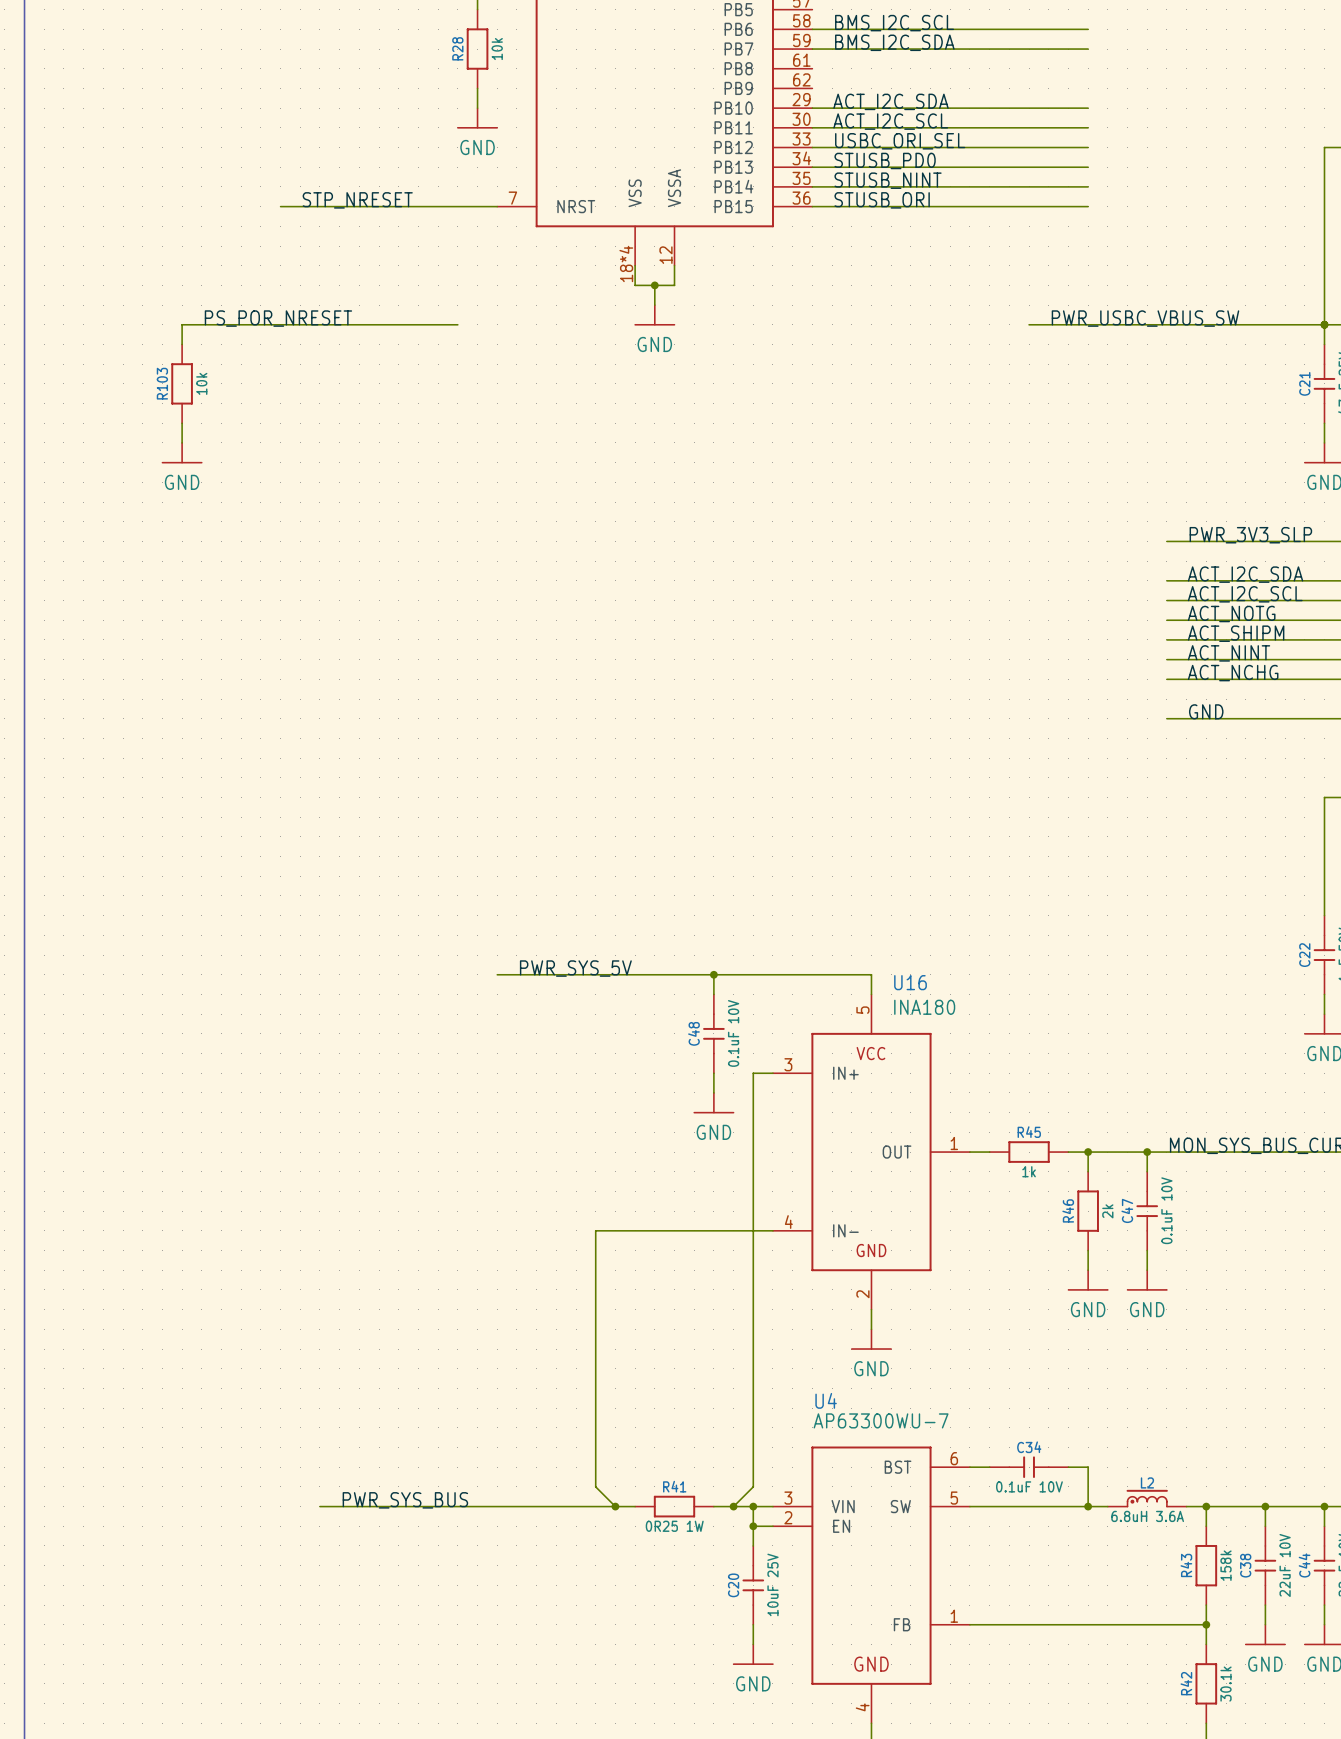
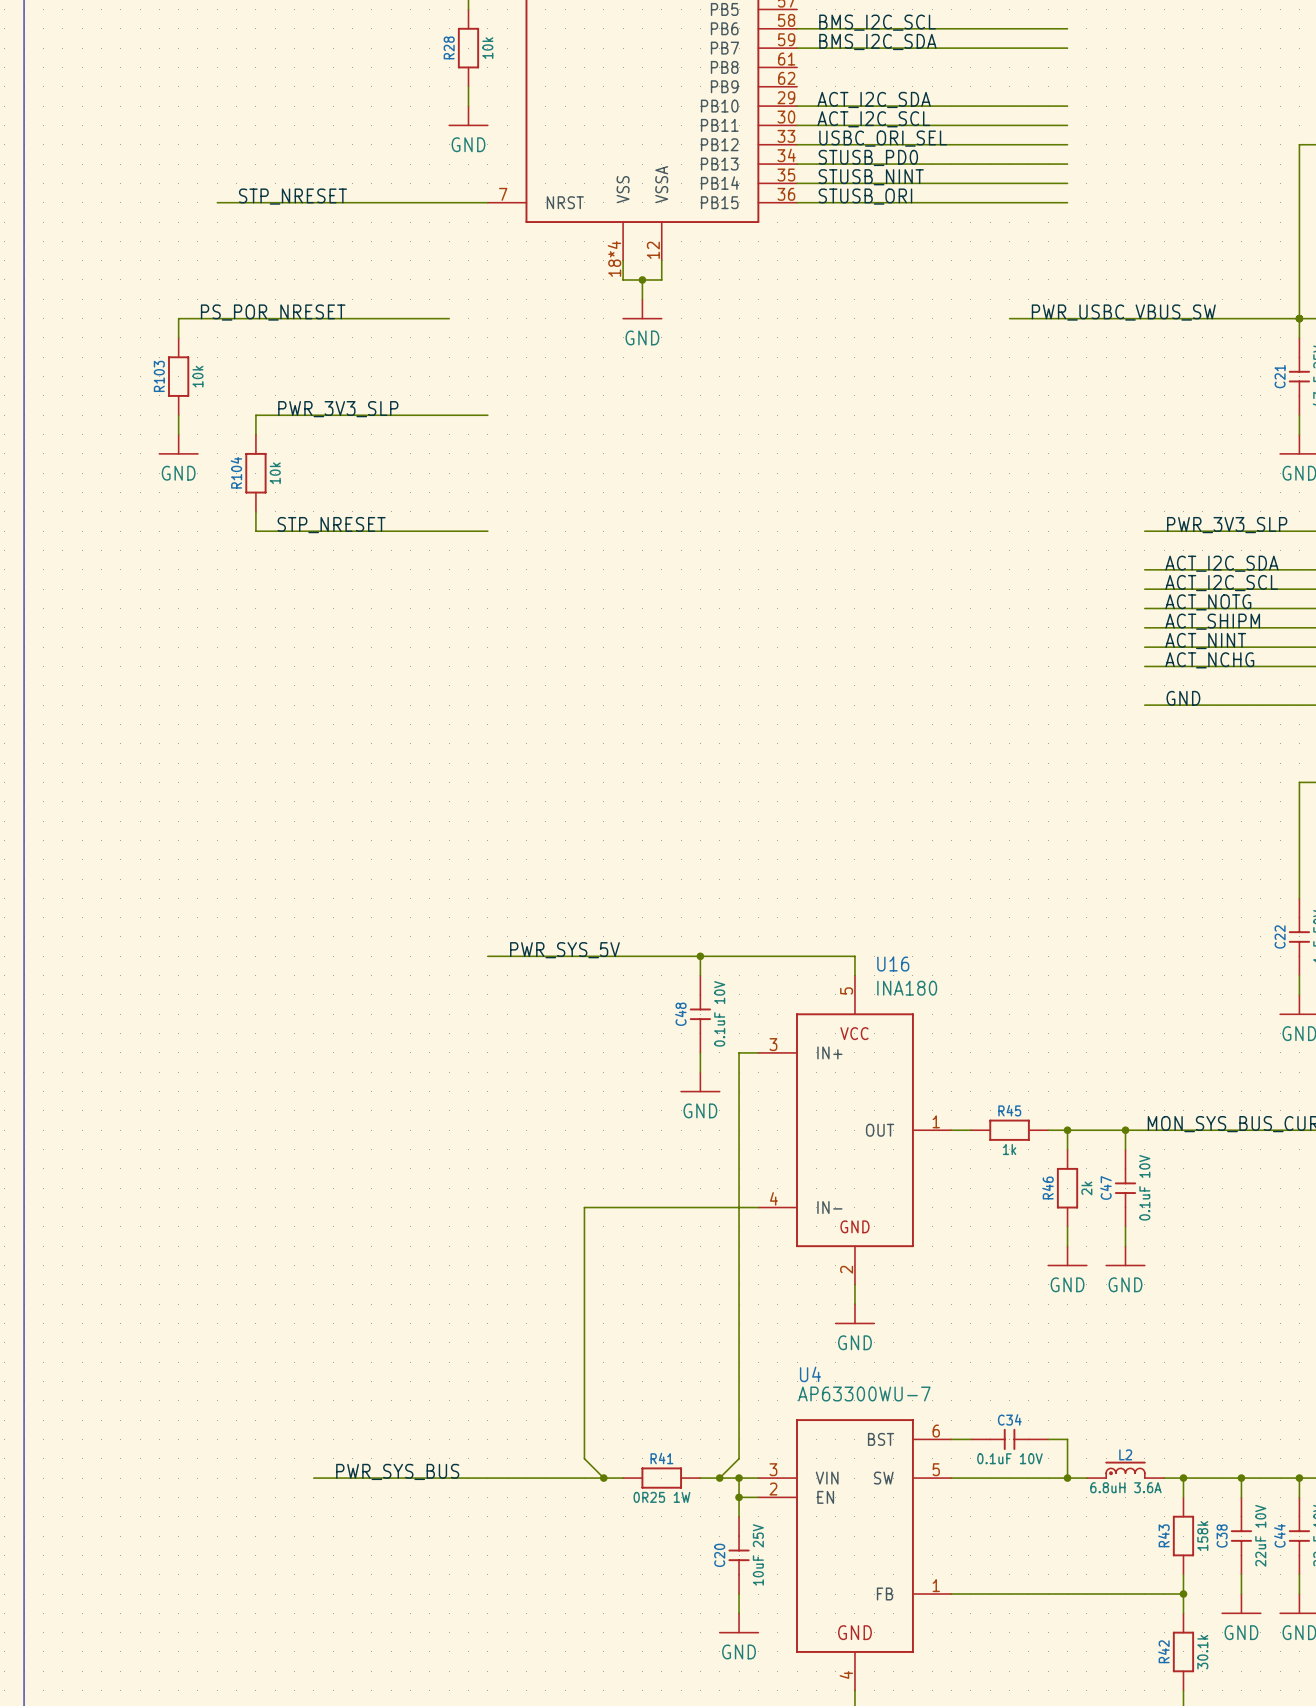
label position: STP_NRESET (357, 200) -> STP_NRESET (292, 196)
wire: none -> (217, 202) (275, 202)
label: none -> PWR_3V3_SLP (338, 409)
wire: none -> (487, 415) (255, 415) (255, 434)
R104: none -> 10k (255, 473)
wire: none -> (255, 511) (255, 531) (487, 531)
label: none -> STP_NRESET (331, 525)

